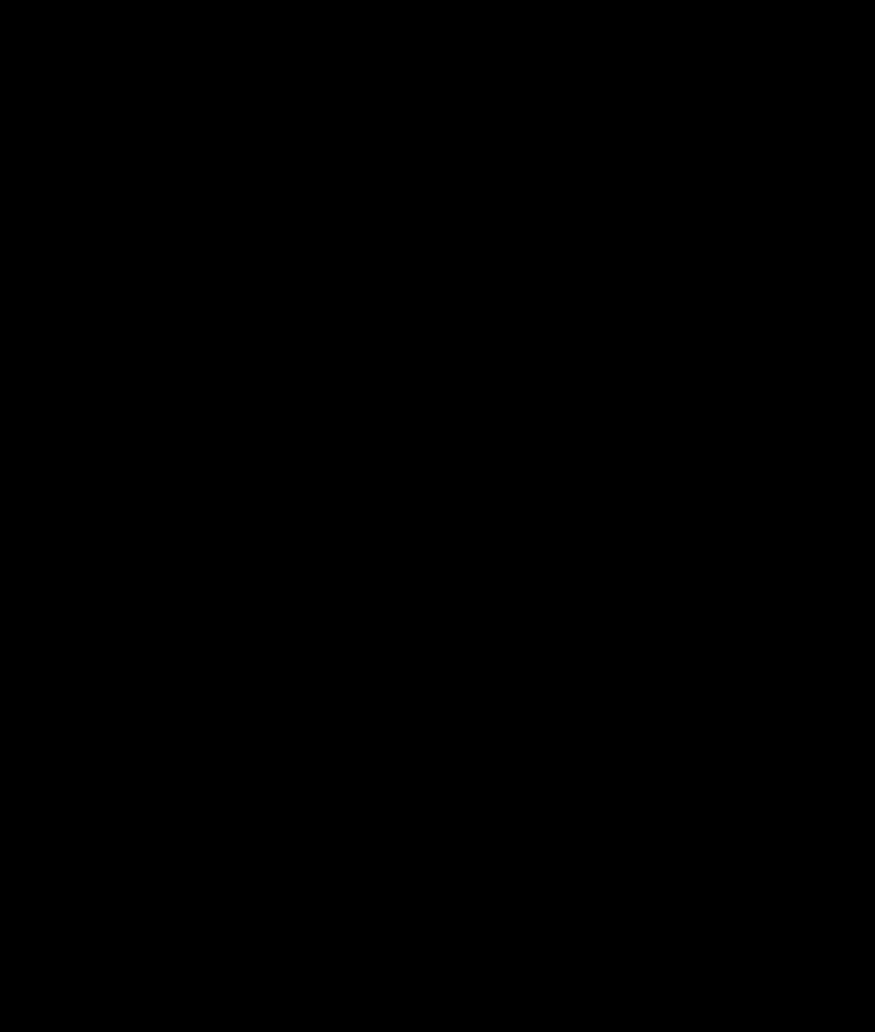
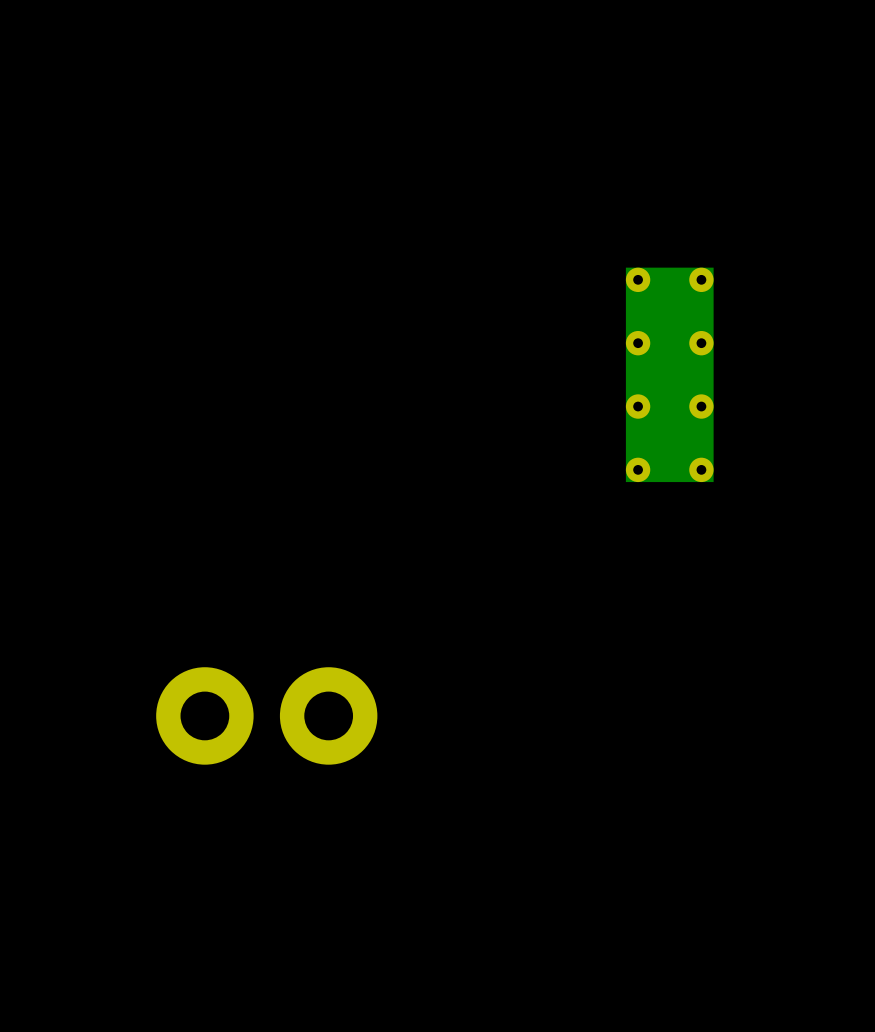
part: none -> (669, 374)
part: none -> (266, 715)

